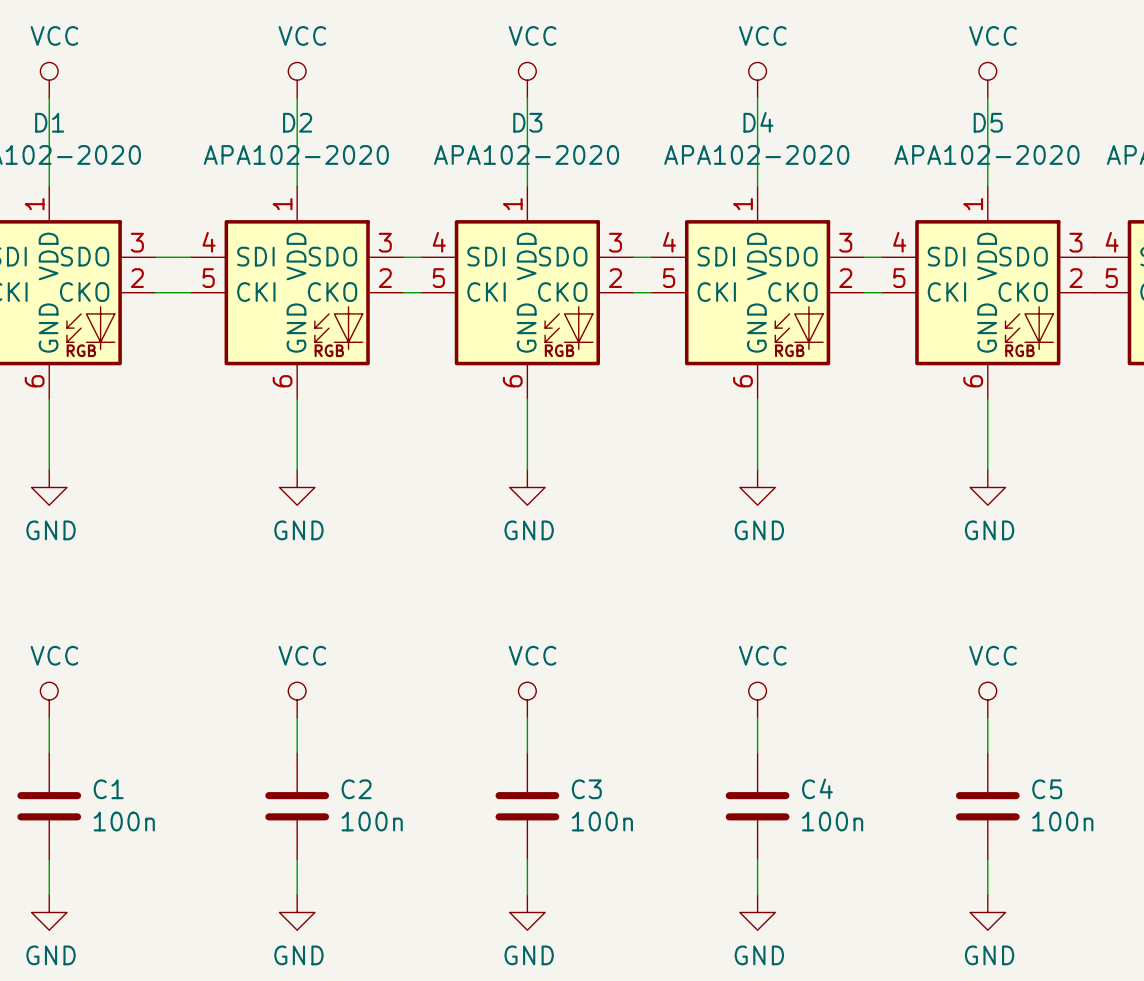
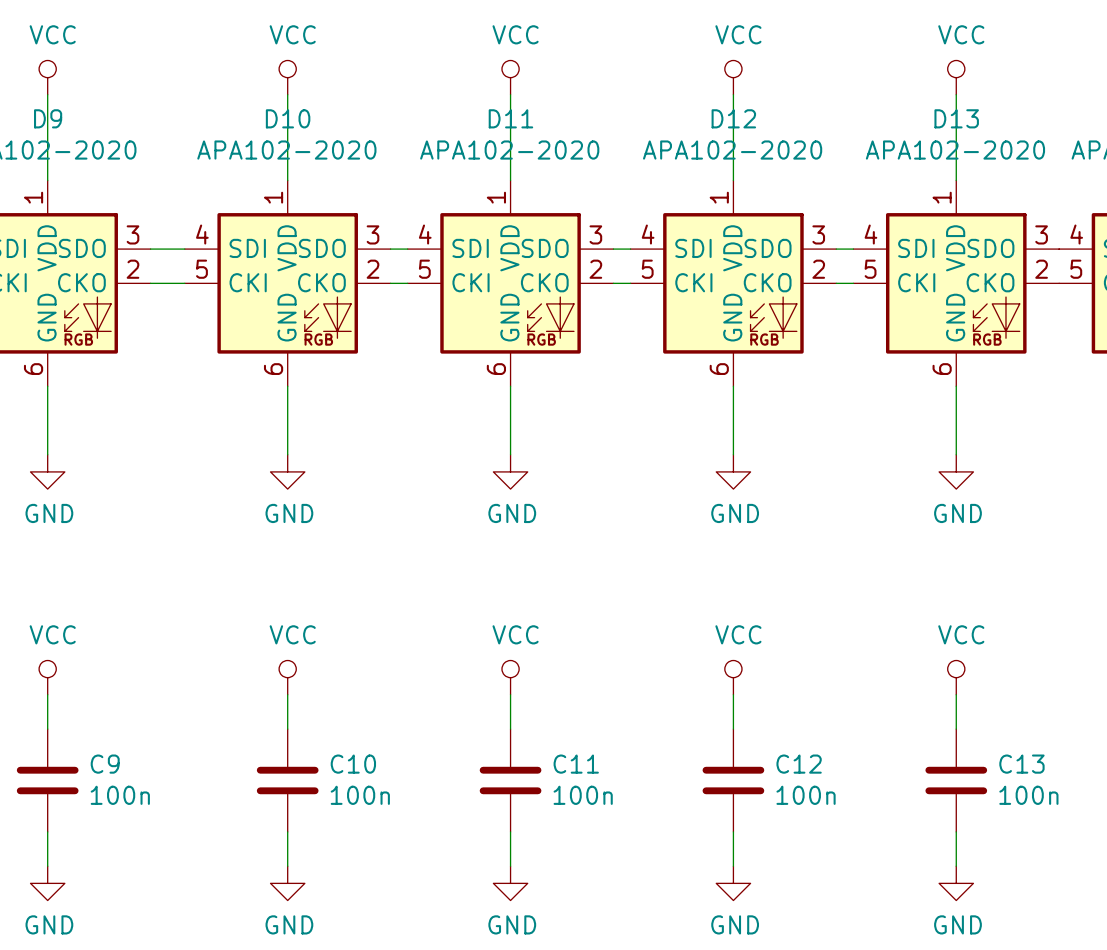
D1 name: D1 (49, 122) -> D9 (48, 118)
D2 name: D2 (297, 122) -> D10 (288, 118)
D3 name: D3 (527, 122) -> D11 (510, 118)
D4 name: D4 (758, 122) -> D12 (733, 118)
D5 name: D5 (988, 122) -> D13 (956, 118)
C4 name: C4 (817, 788) -> C12 (799, 764)
C1 name: C1 (108, 789) -> C9 (105, 764)
C2 name: C2 (356, 789) -> C10 (353, 764)
C3 name: C3 (586, 789) -> C11 (576, 764)
C5 name: C5 (1047, 789) -> C13 (1021, 764)

